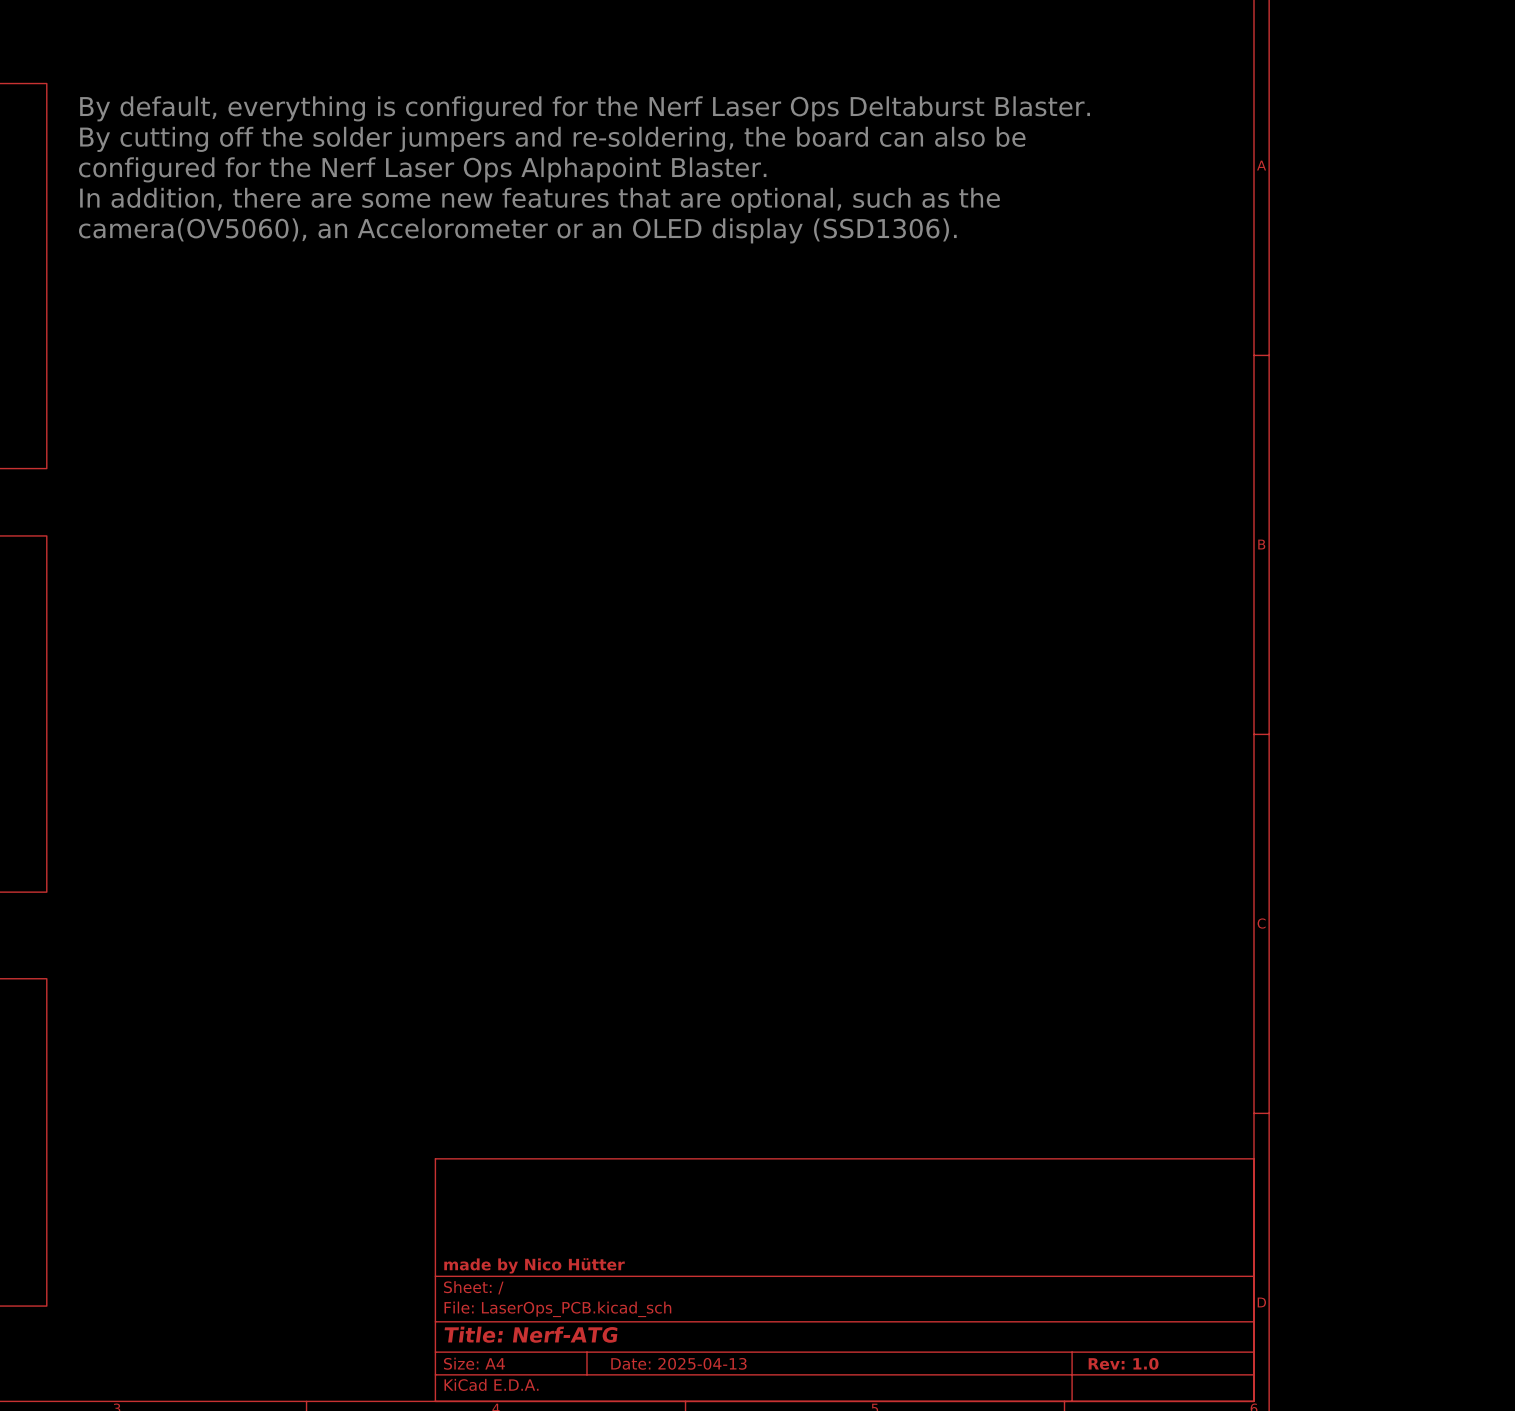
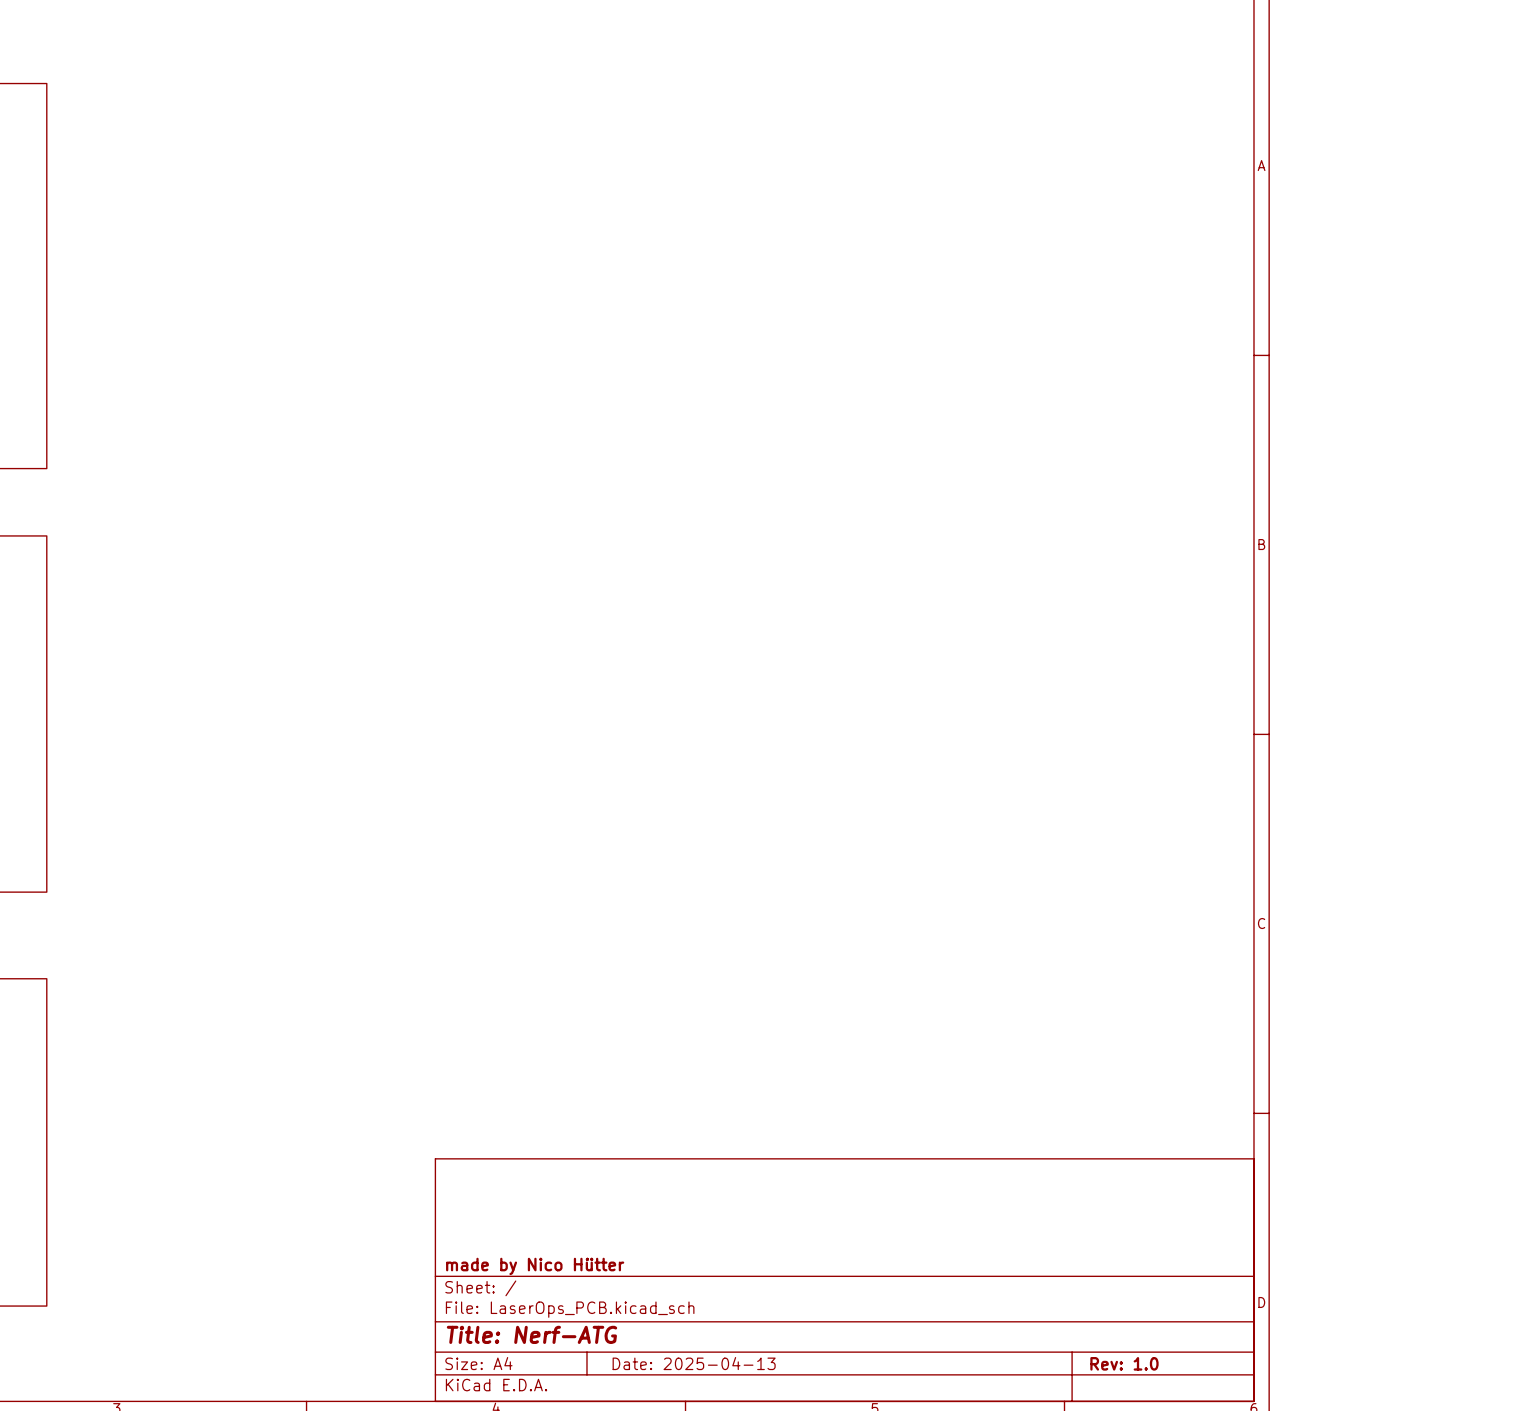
text: By default, everything is configured for the Nerf Laser Ops Deltaburst Blaster. (585, 108) -> none
text: By cutting off the solder jumpers and re-soldering, the board can also be (552, 139) -> none
text: configured for the Nerf Laser Ops Alphapoint Blaster. (422, 169) -> none
text: In addition, there are some new features that are optional, such as the (540, 200) -> none
text: camera(OV5060), an Accelorometer or an OLED display (SSD1306). (517, 230) -> none

